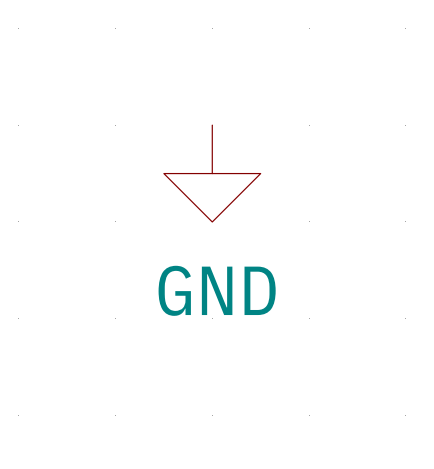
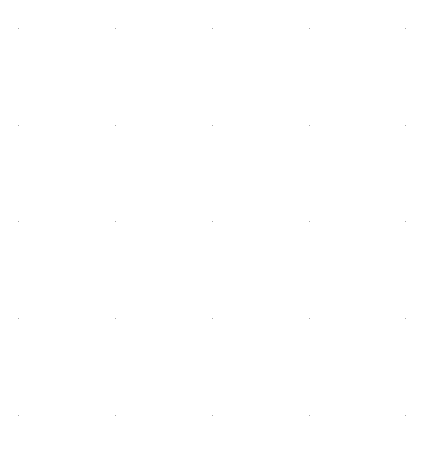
power symbol: GND (212, 173) -> none

